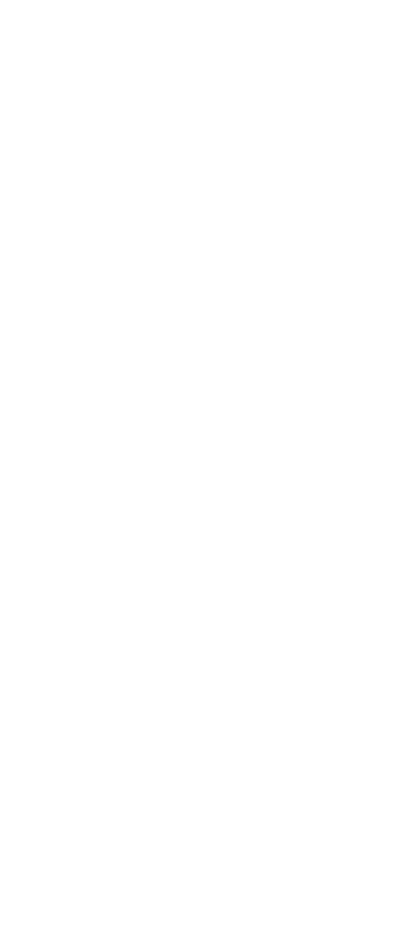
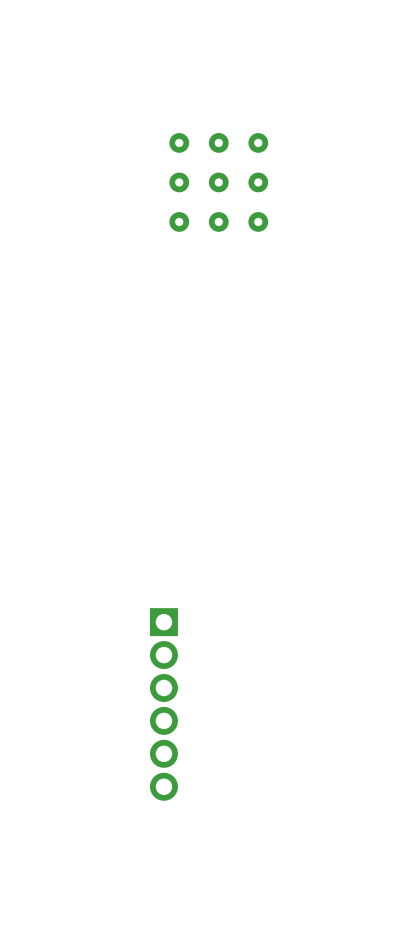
part: none -> (218, 182)
part: none -> (163, 704)

